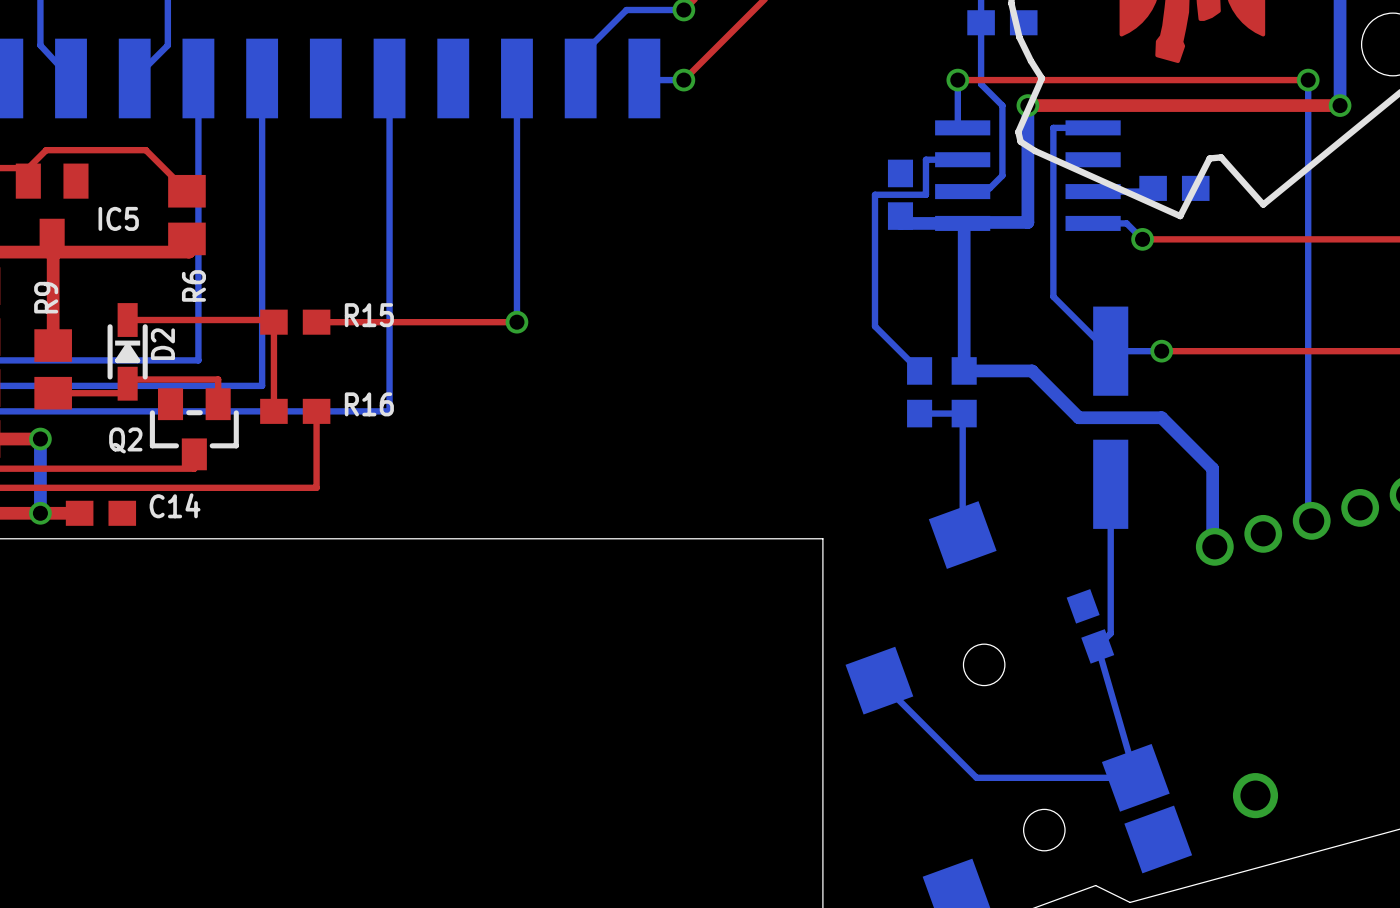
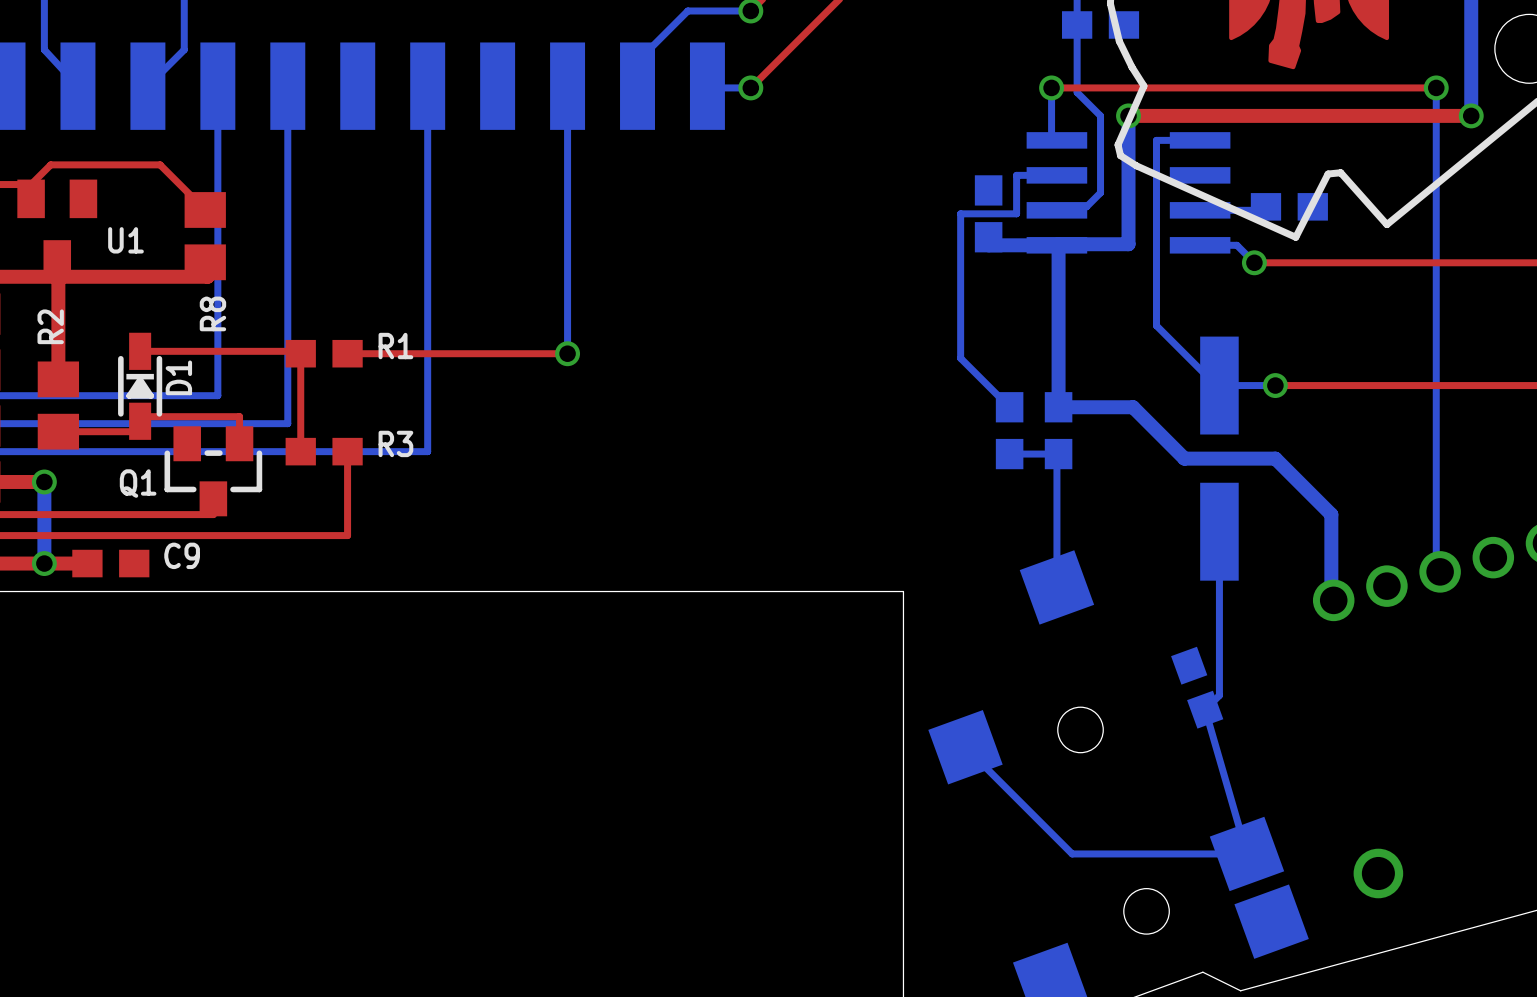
IC5 name: IC5 (118, 218) -> U1 (125, 240)
R6 name: R6 (193, 285) -> R8 (212, 313)
R9 name: R9 (46, 297) -> R2 (50, 326)
R15 name: R15 (369, 315) -> R1 (395, 346)
D2 name: D2 (162, 344) -> D1 (178, 377)
R16 name: R16 (369, 404) -> R3 (395, 443)
Q2 name: Q2 (125, 440) -> Q1 (138, 483)
C14 name: C14 (175, 505) -> C9 (182, 555)

